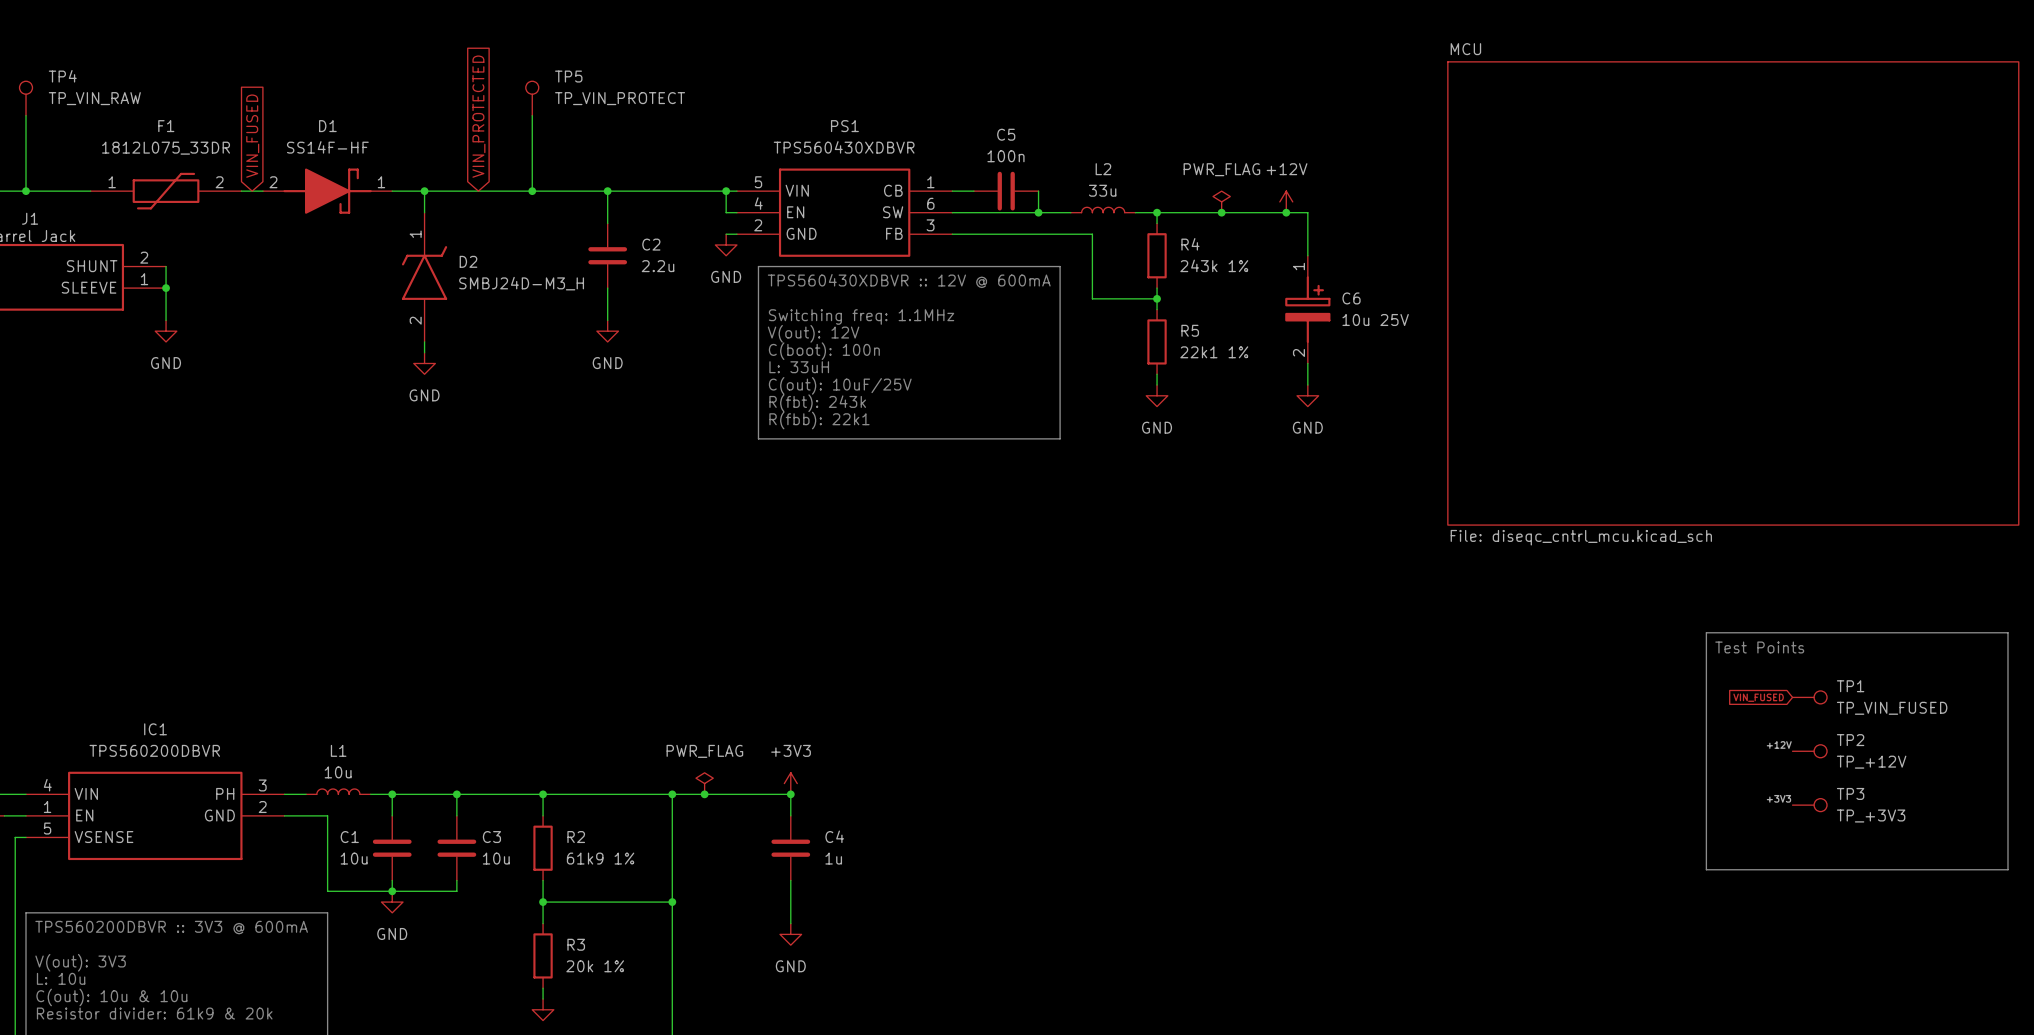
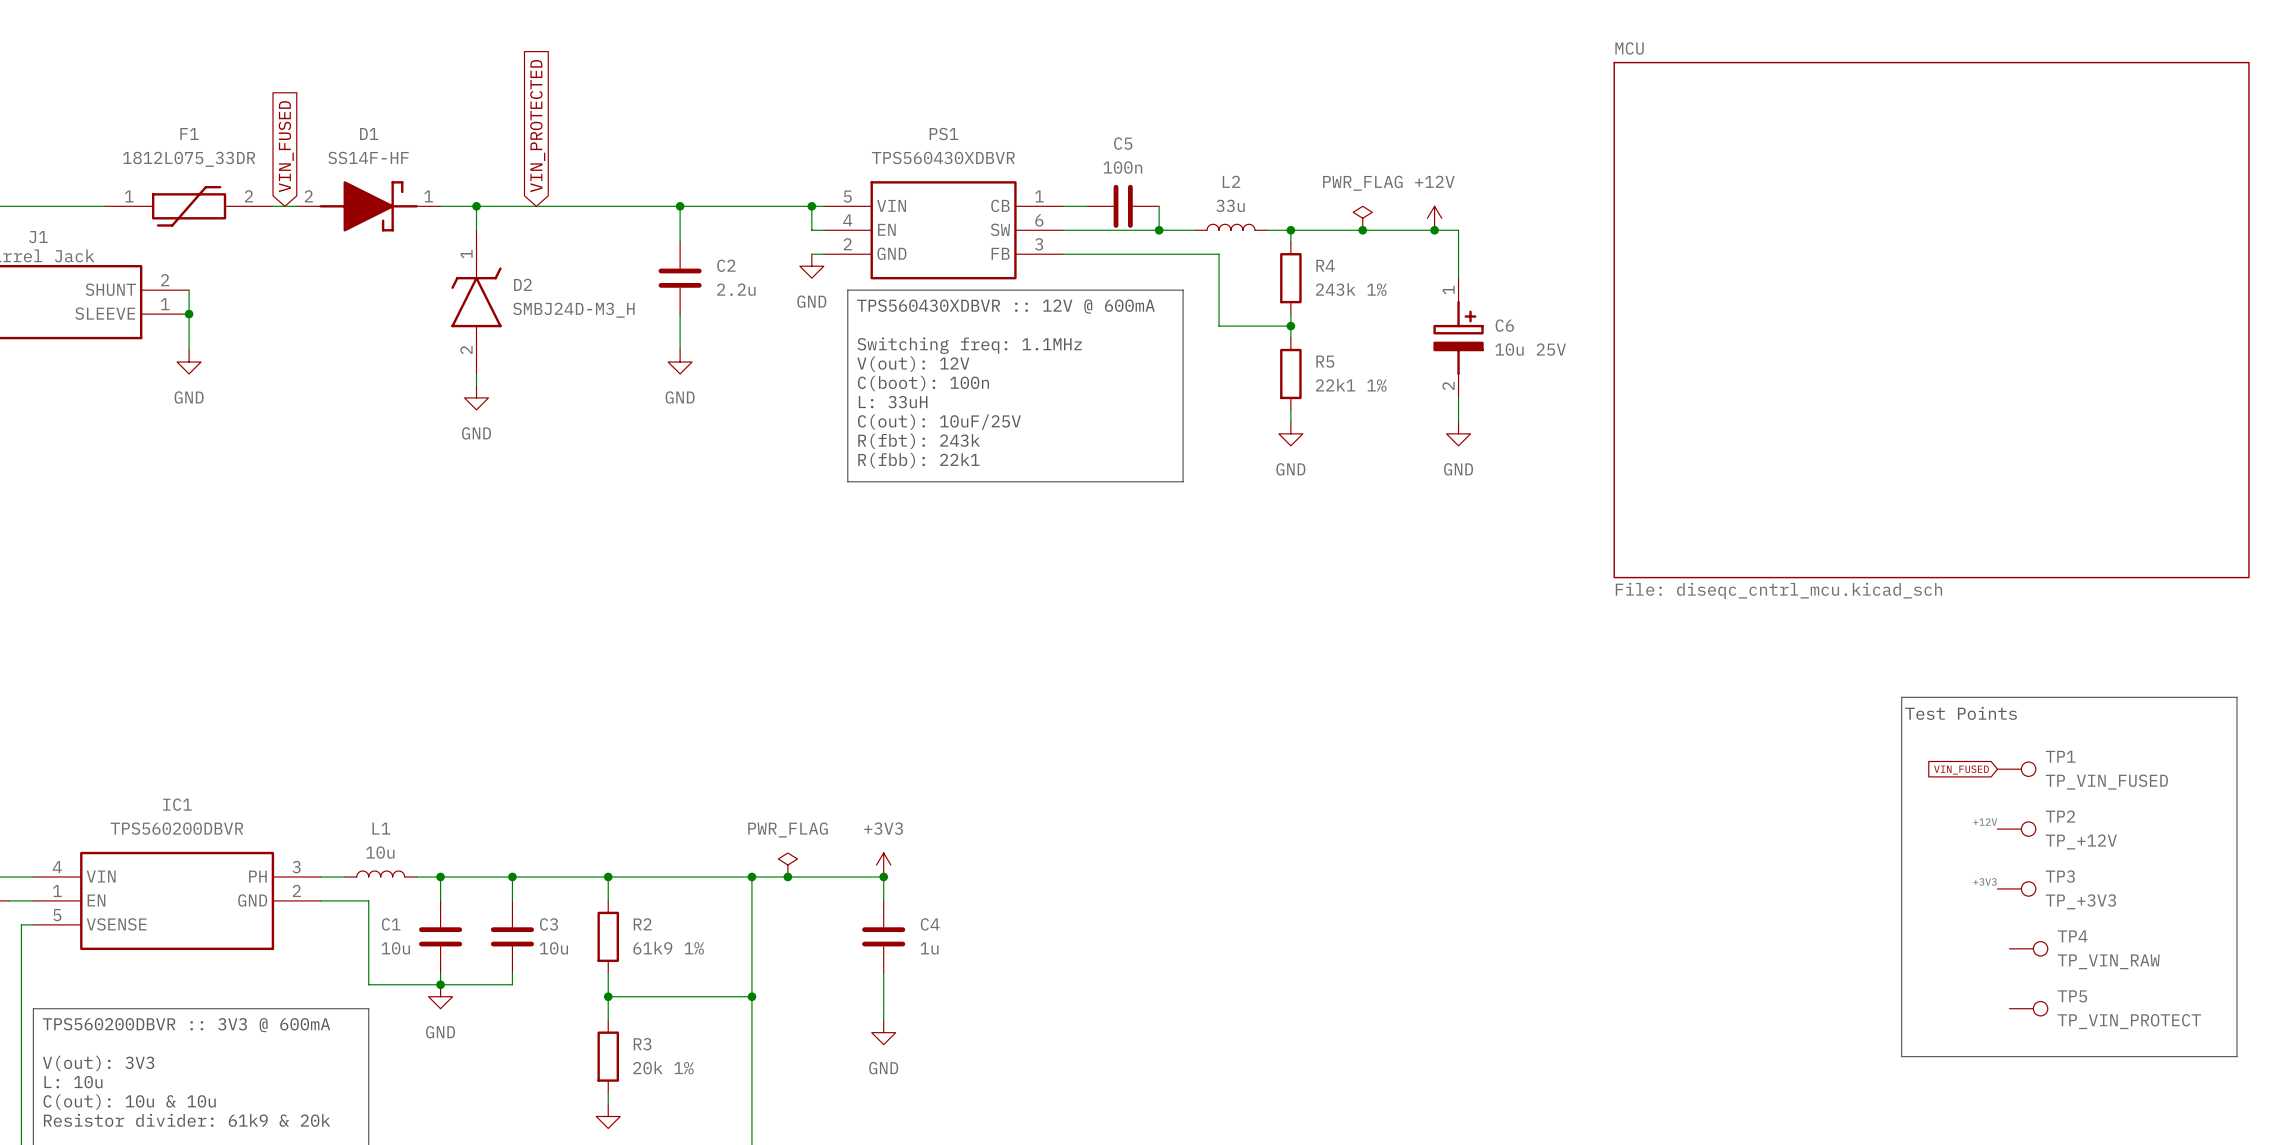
TP4 rotation: 0° (26, 87) -> 90° clockwise (2040, 948)
TP5 rotation: 0° (532, 87) -> 90° clockwise (2040, 1008)
TP4 position: (26, 98) -> (2028, 948)
TP5 position: (532, 98) -> (2028, 1008)
wire: (26, 115) (26, 191) -> none
wire: (532, 115) (532, 191) -> none
junction: (26, 191) -> none
junction: (532, 191) -> none
line: (1706, 869) (2007, 869) -> (1901, 960) (1901, 1056) (2236, 1056) (2236, 960)

